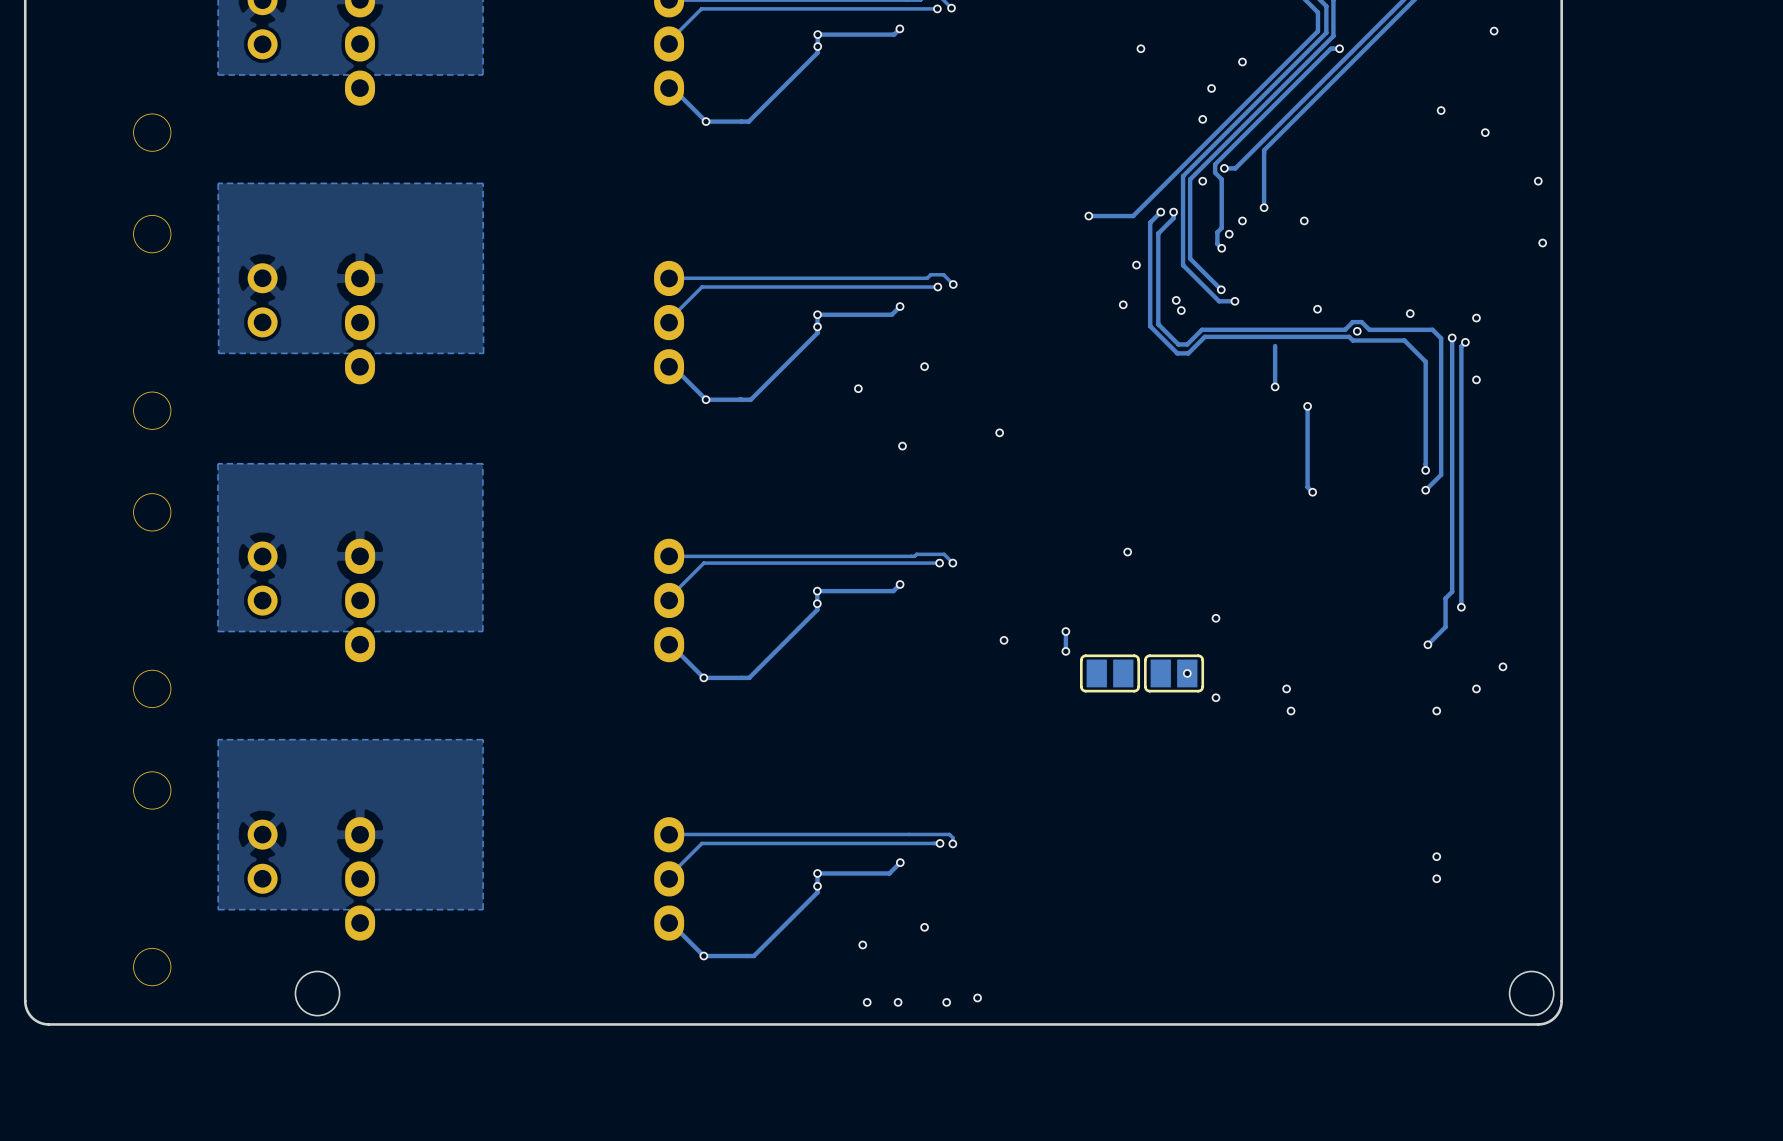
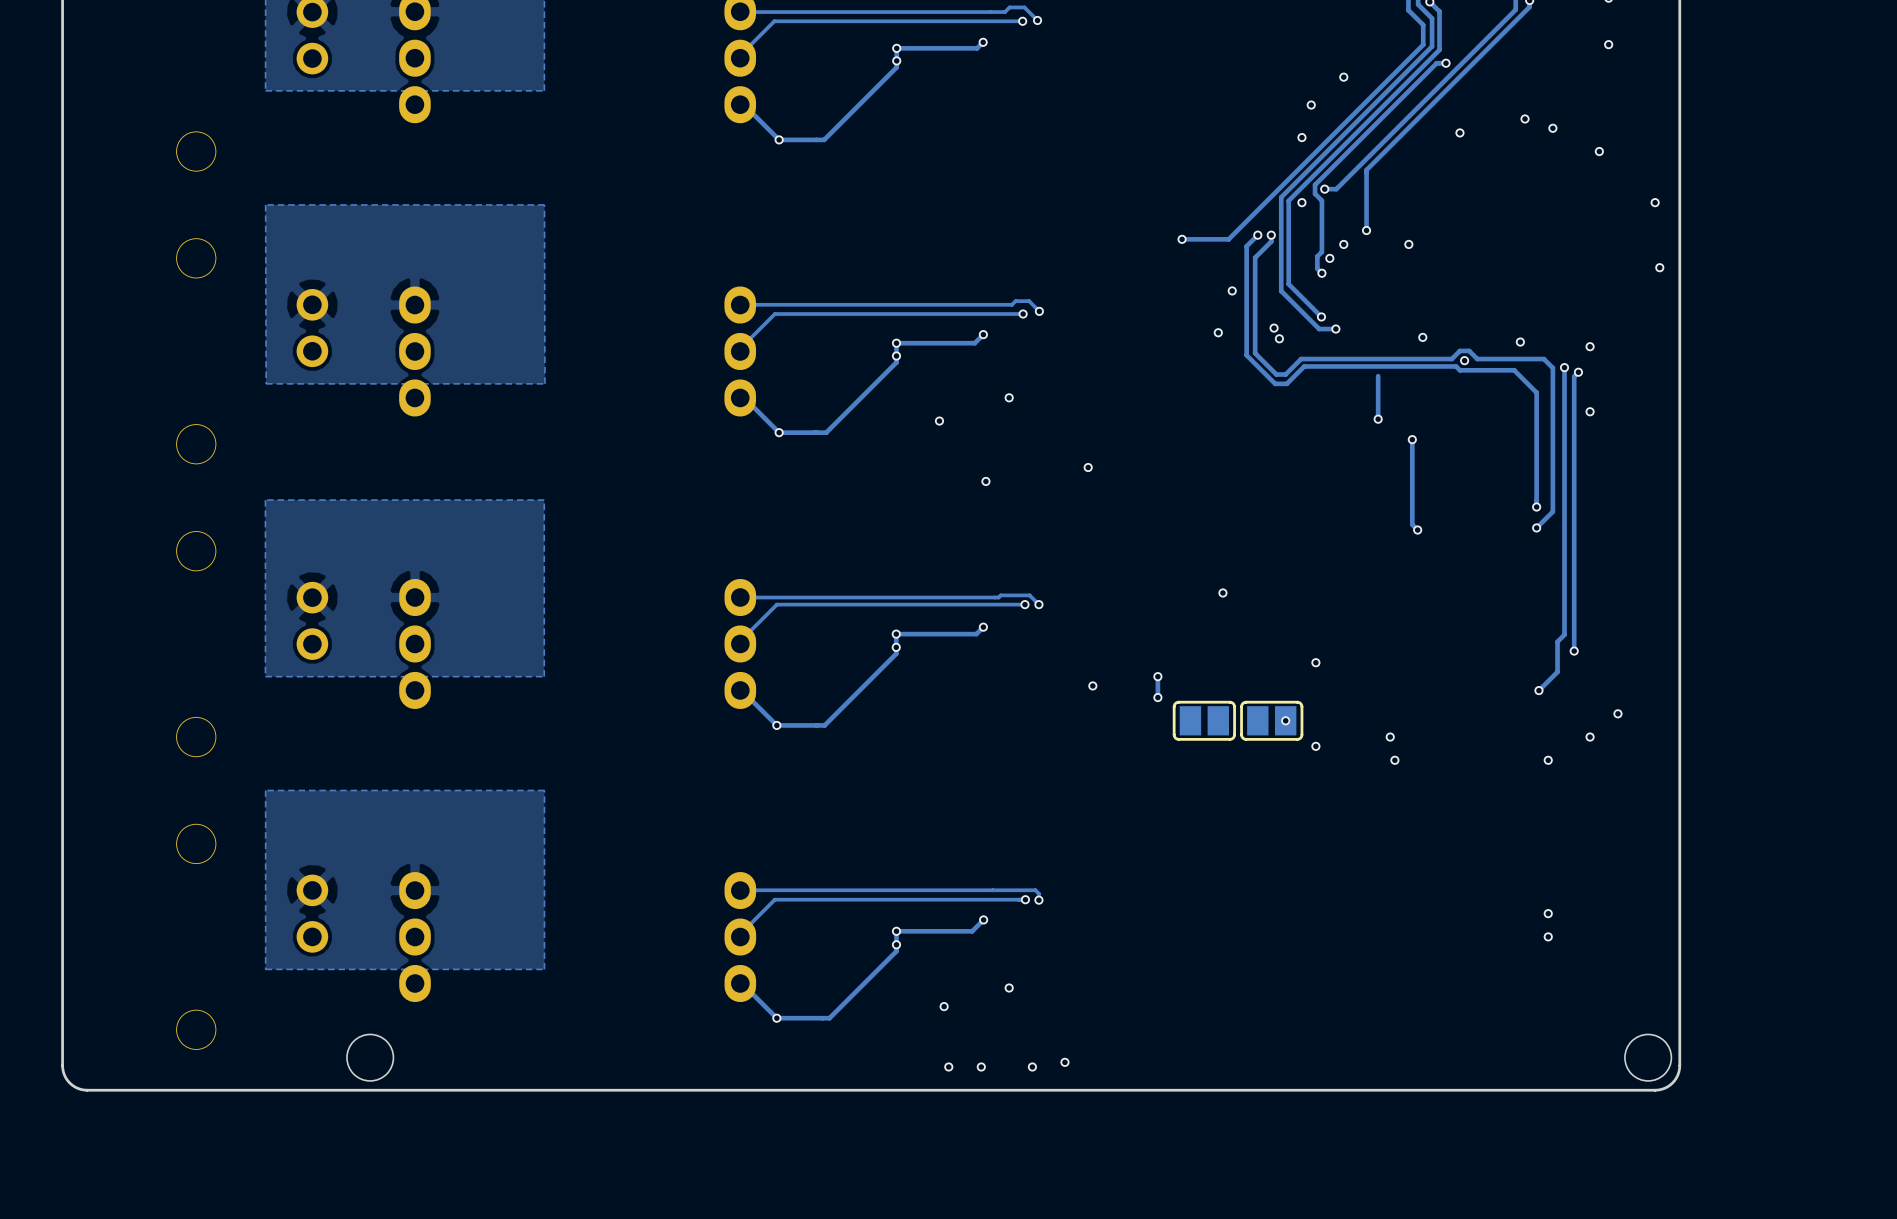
via: (1140, 48) -> none
via: none -> (1525, 118)
via: none -> (1459, 132)

